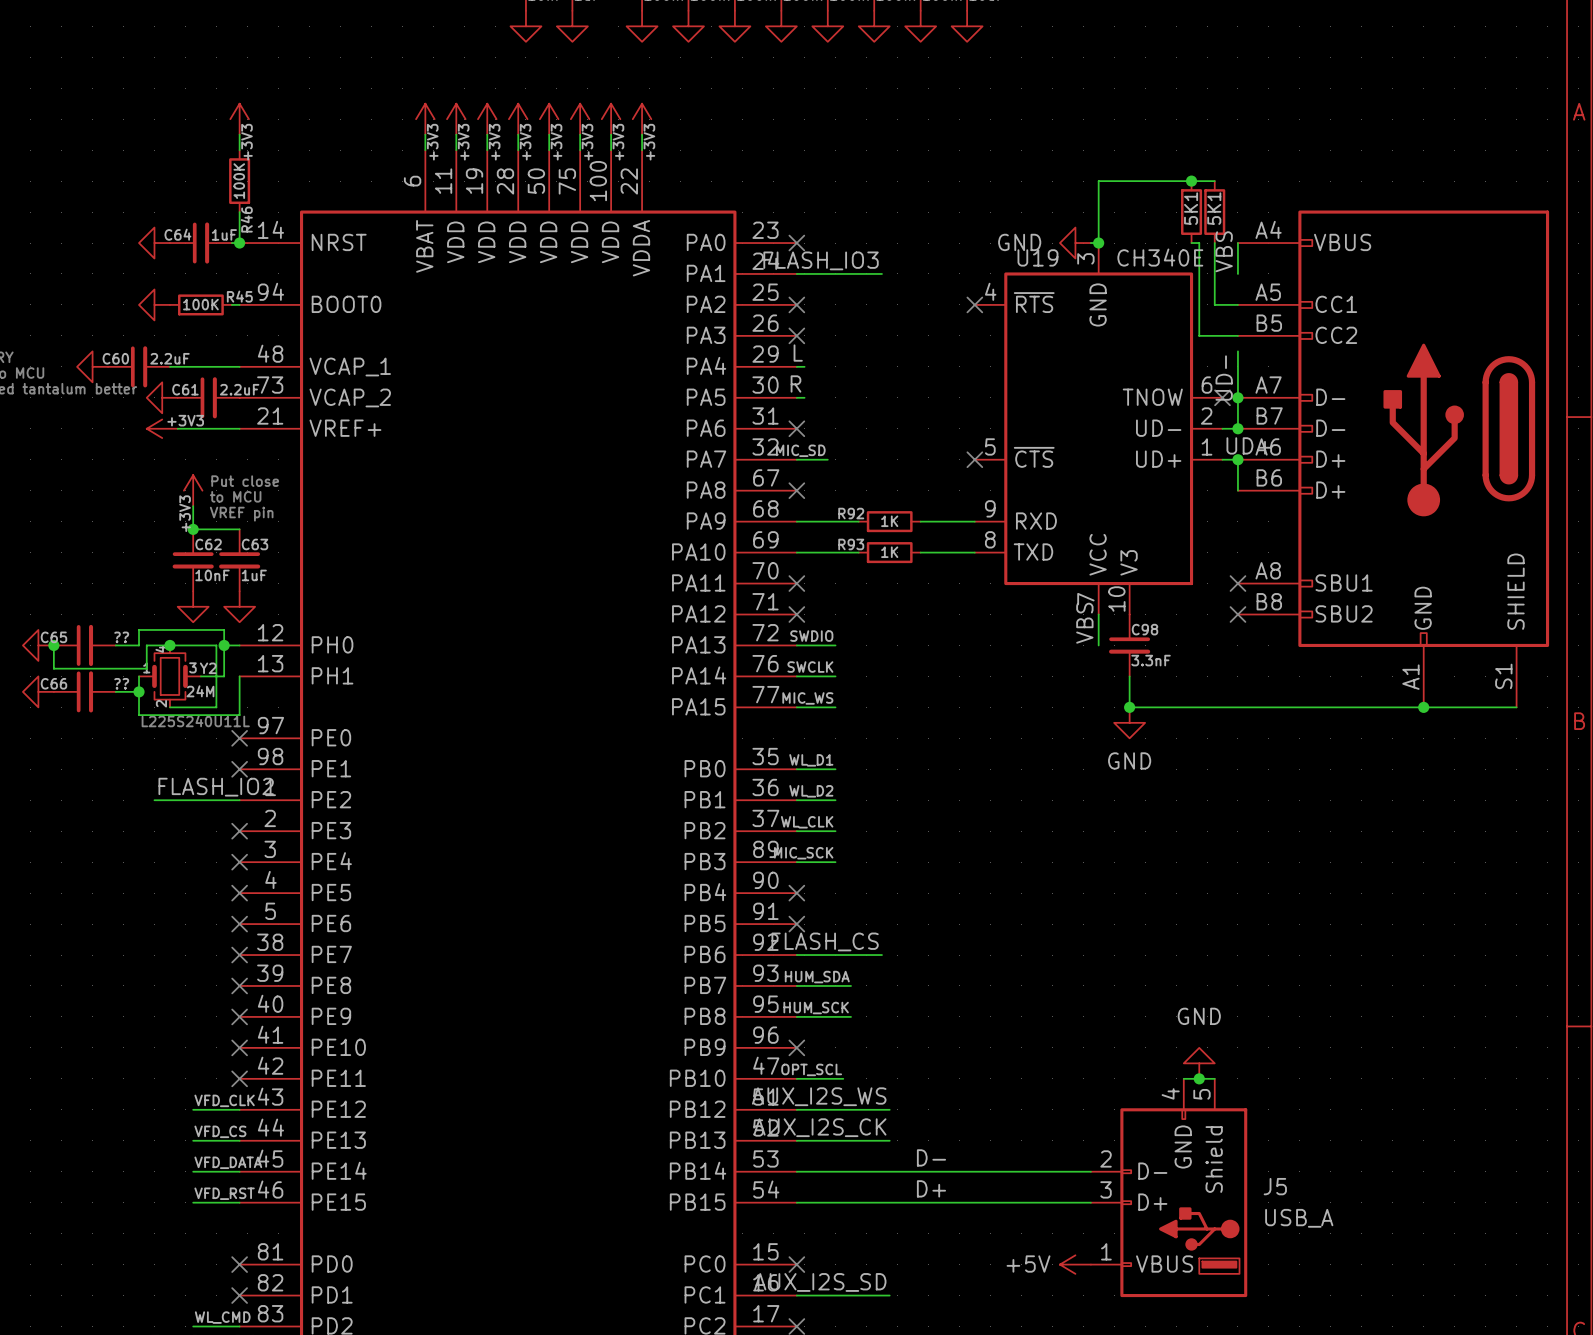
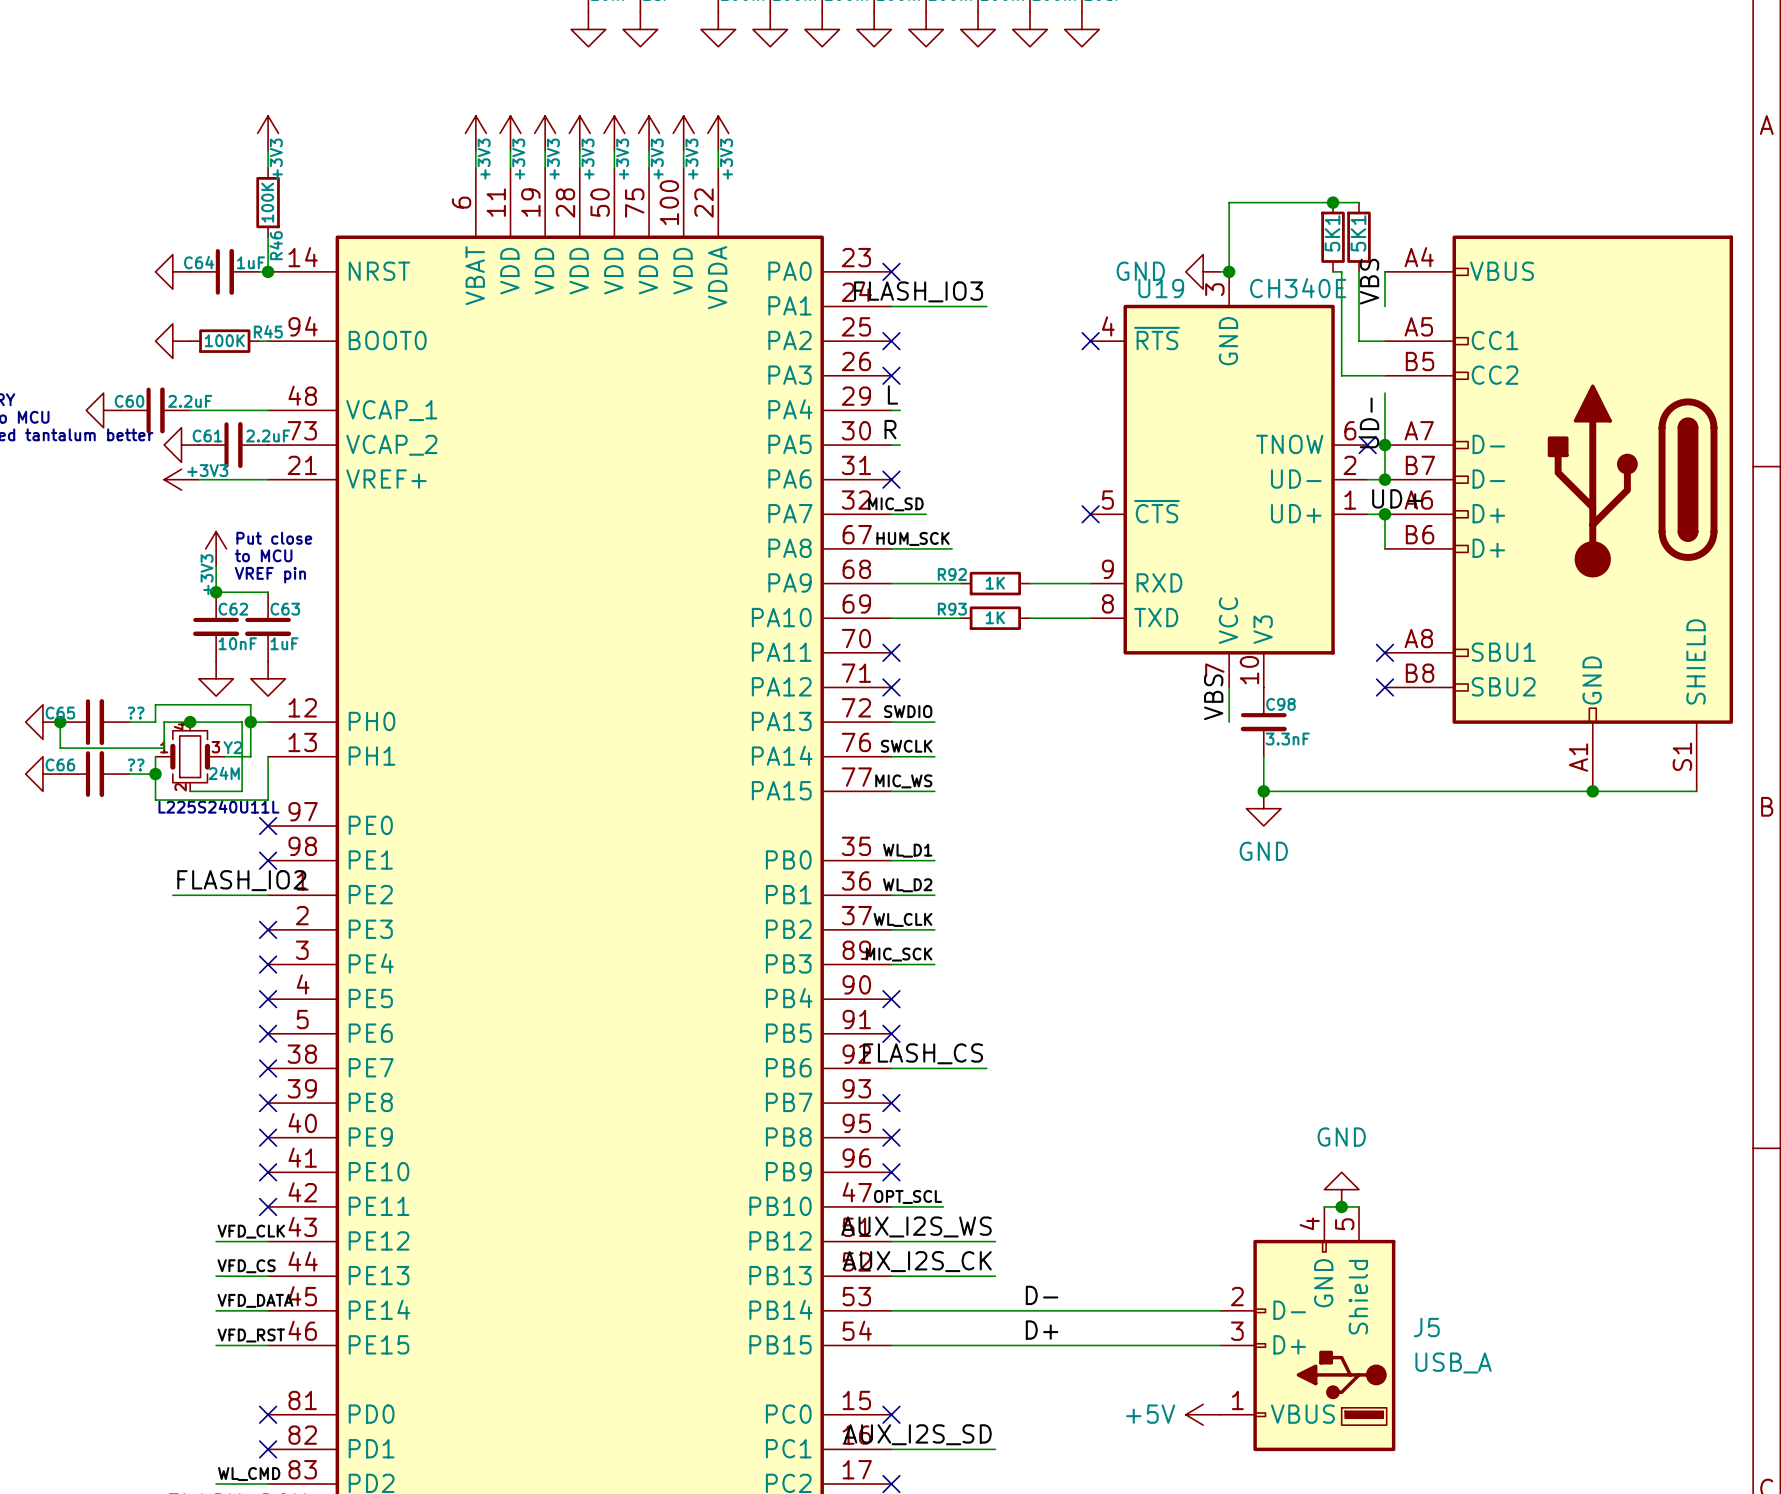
label: none -> HUM_SCK (913, 538)
wire: none -> (891, 548) (952, 548)
no-connect mark: (796, 490) -> none
label: HUM_SDA (817, 977) -> none
wire: (796, 985) (851, 985) -> none
no-connect mark: none -> (891, 1103)
label: HUM_SCK (816, 1008) -> none
wire: (796, 1016) (851, 1016) -> none
no-connect mark: none -> (891, 1137)

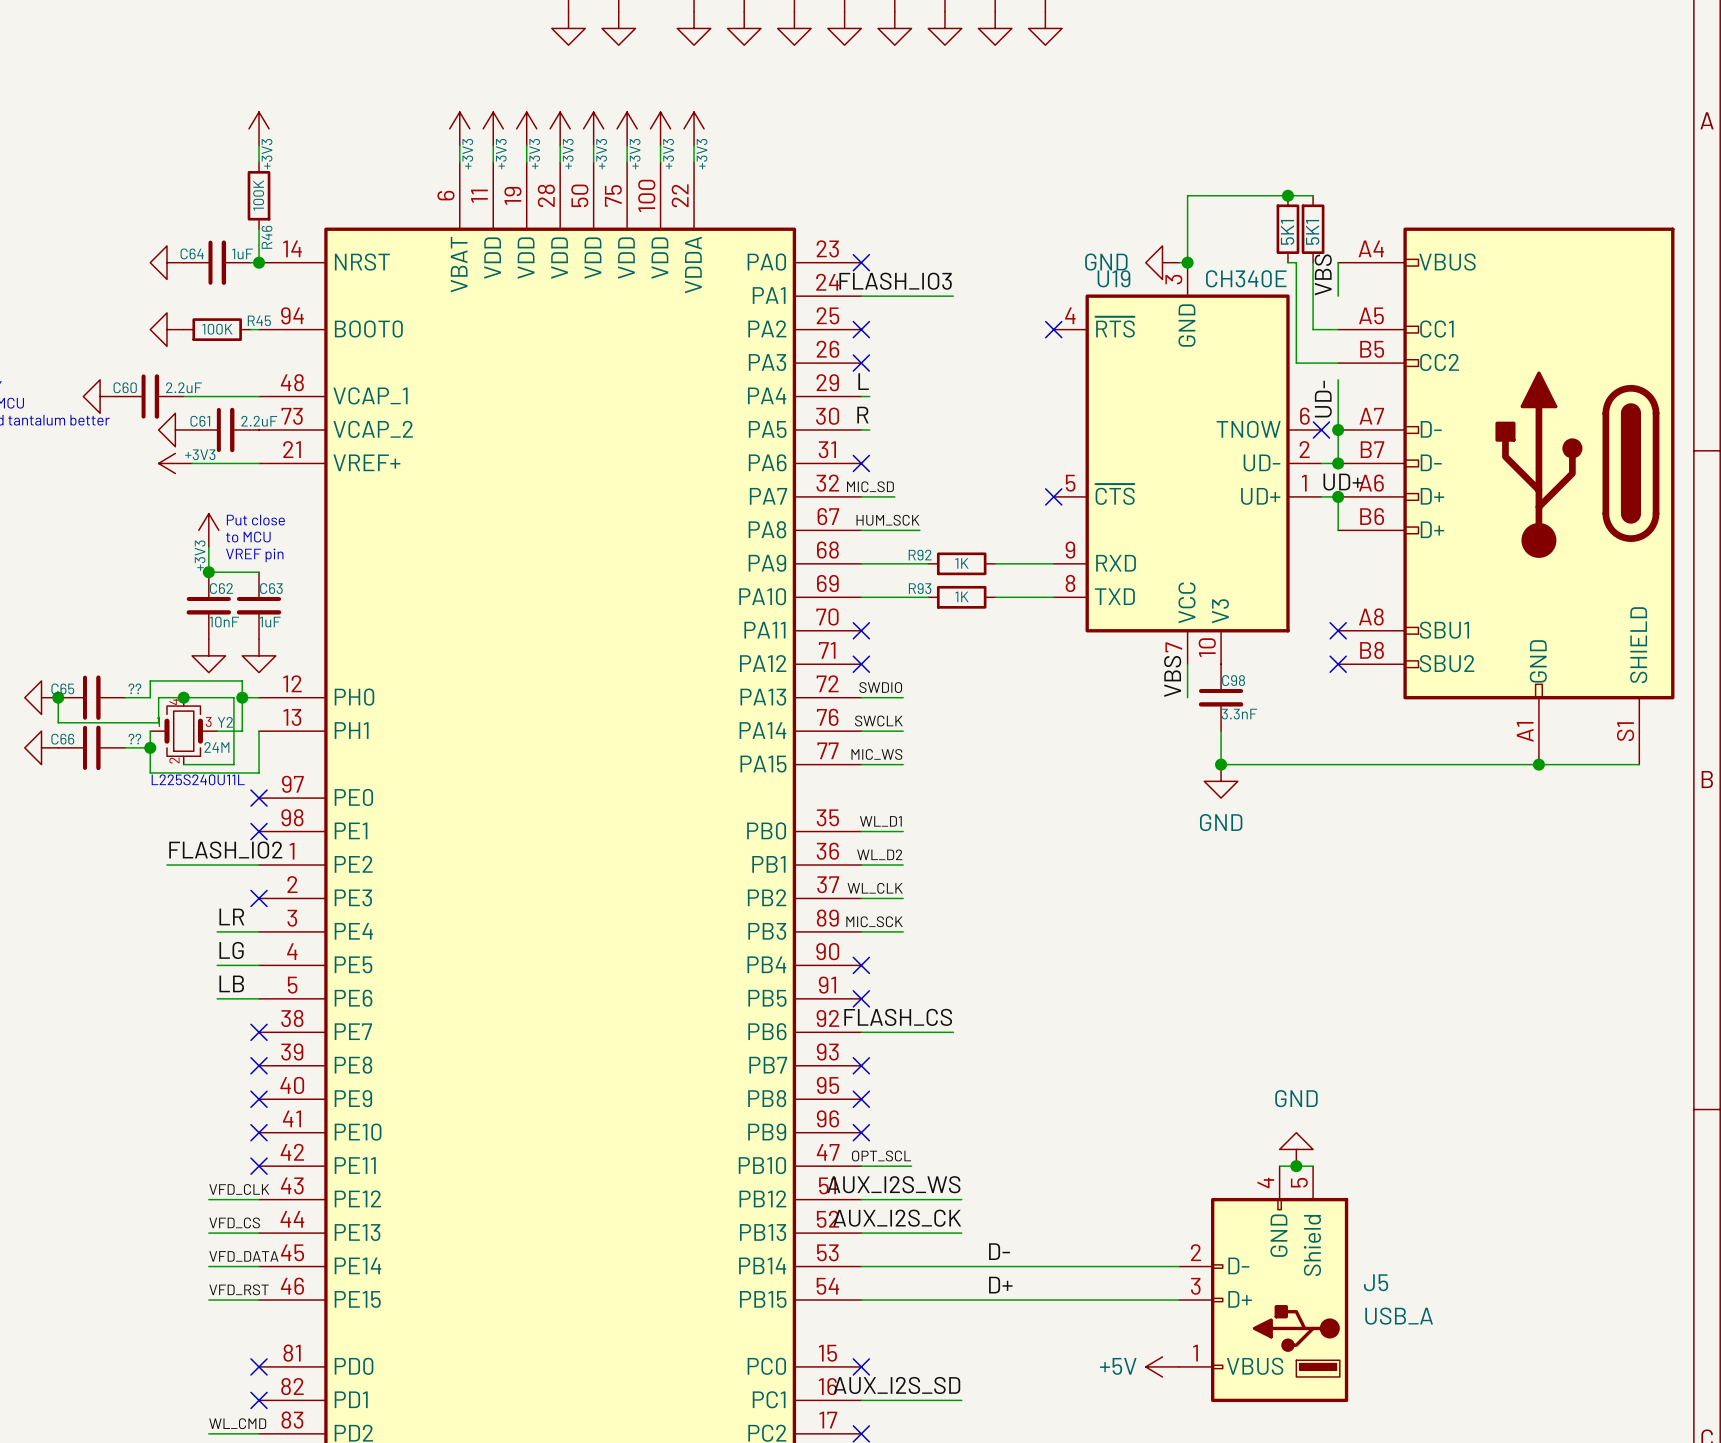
label: none -> LR (231, 917)
wire: none -> (217, 931) (259, 931)
no-connect mark: (268, 964) -> none
label: none -> LG (231, 950)
wire: none -> (217, 965) (259, 965)
no-connect mark: (268, 999) -> none
label: none -> LB (231, 983)
wire: none -> (217, 998) (259, 998)
no-connect mark: (268, 1033) -> none

